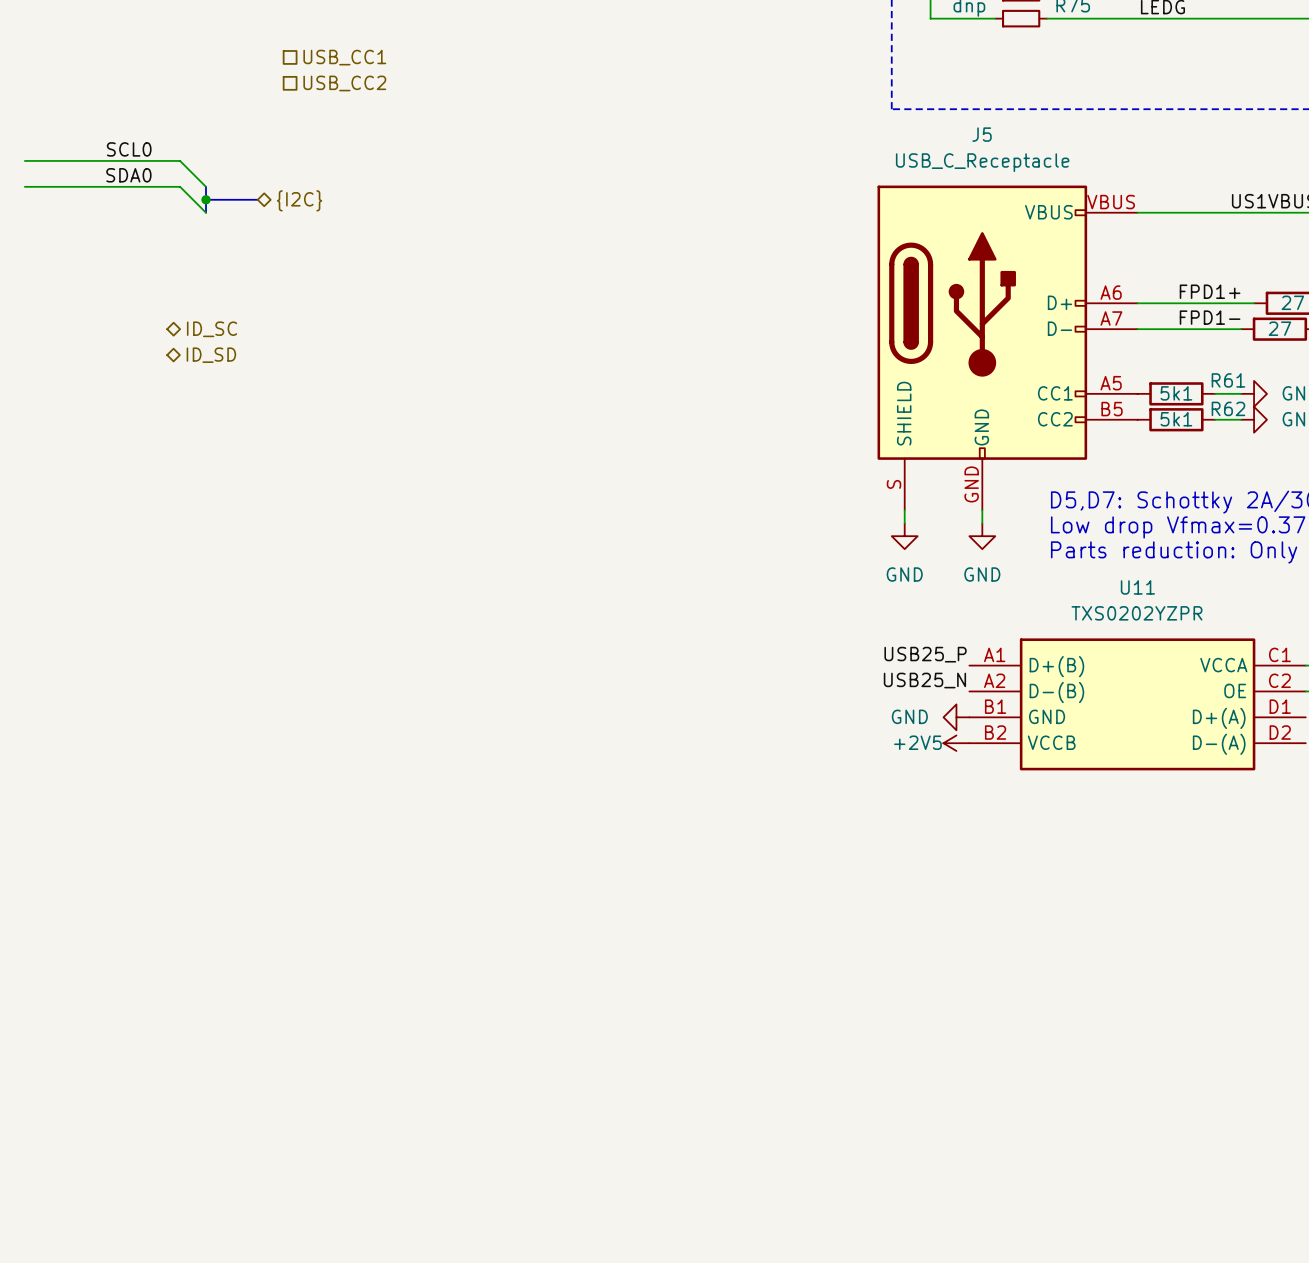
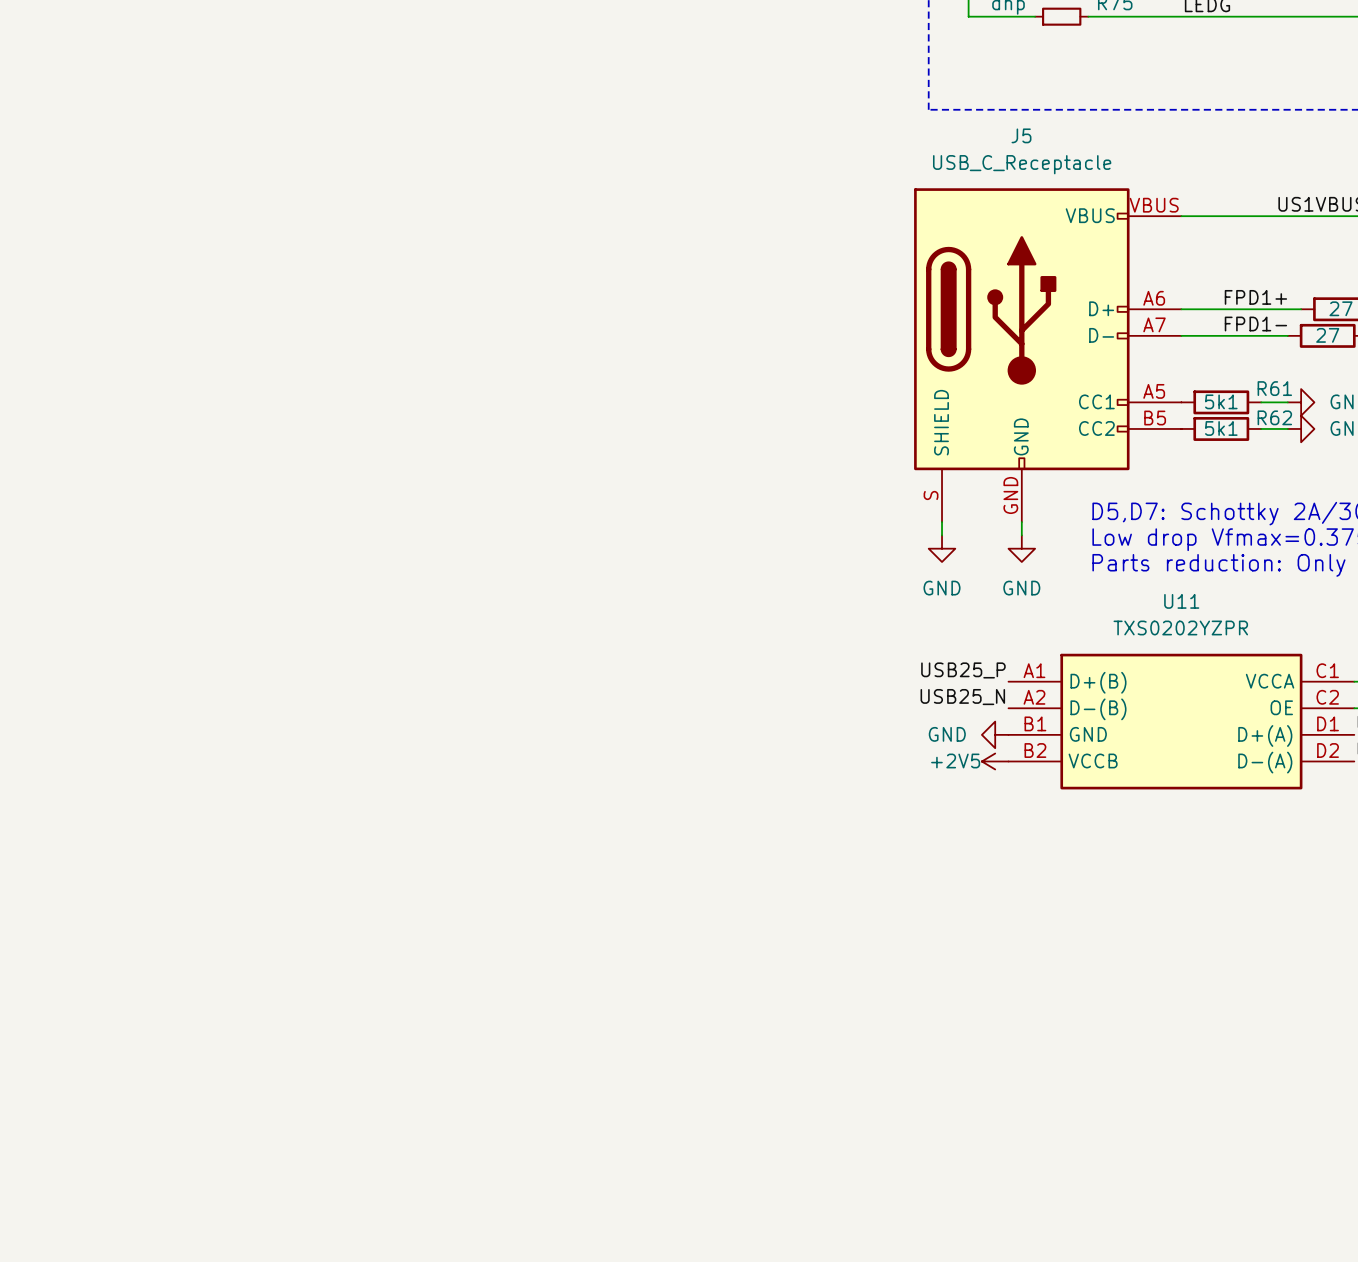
hierarchical label: USB_CC1 (344, 57) -> none
hierarchical label: USB_CC2 (344, 83) -> none
label: SCL0 (129, 149) -> none
wire: (24, 160) (180, 160) (206, 186) -> none
label: SDA0 (128, 175) -> none
wire: (24, 186) (180, 186) (206, 212) -> none
bus: (206, 186) (206, 212) -> none
bus: (206, 199) (257, 199) -> none
junction: (206, 199) -> none
hierarchical label: {I2C} (299, 200) -> none
hierarchical label: ID_SC (212, 329) -> none
hierarchical label: ID_SD (211, 355) -> none

